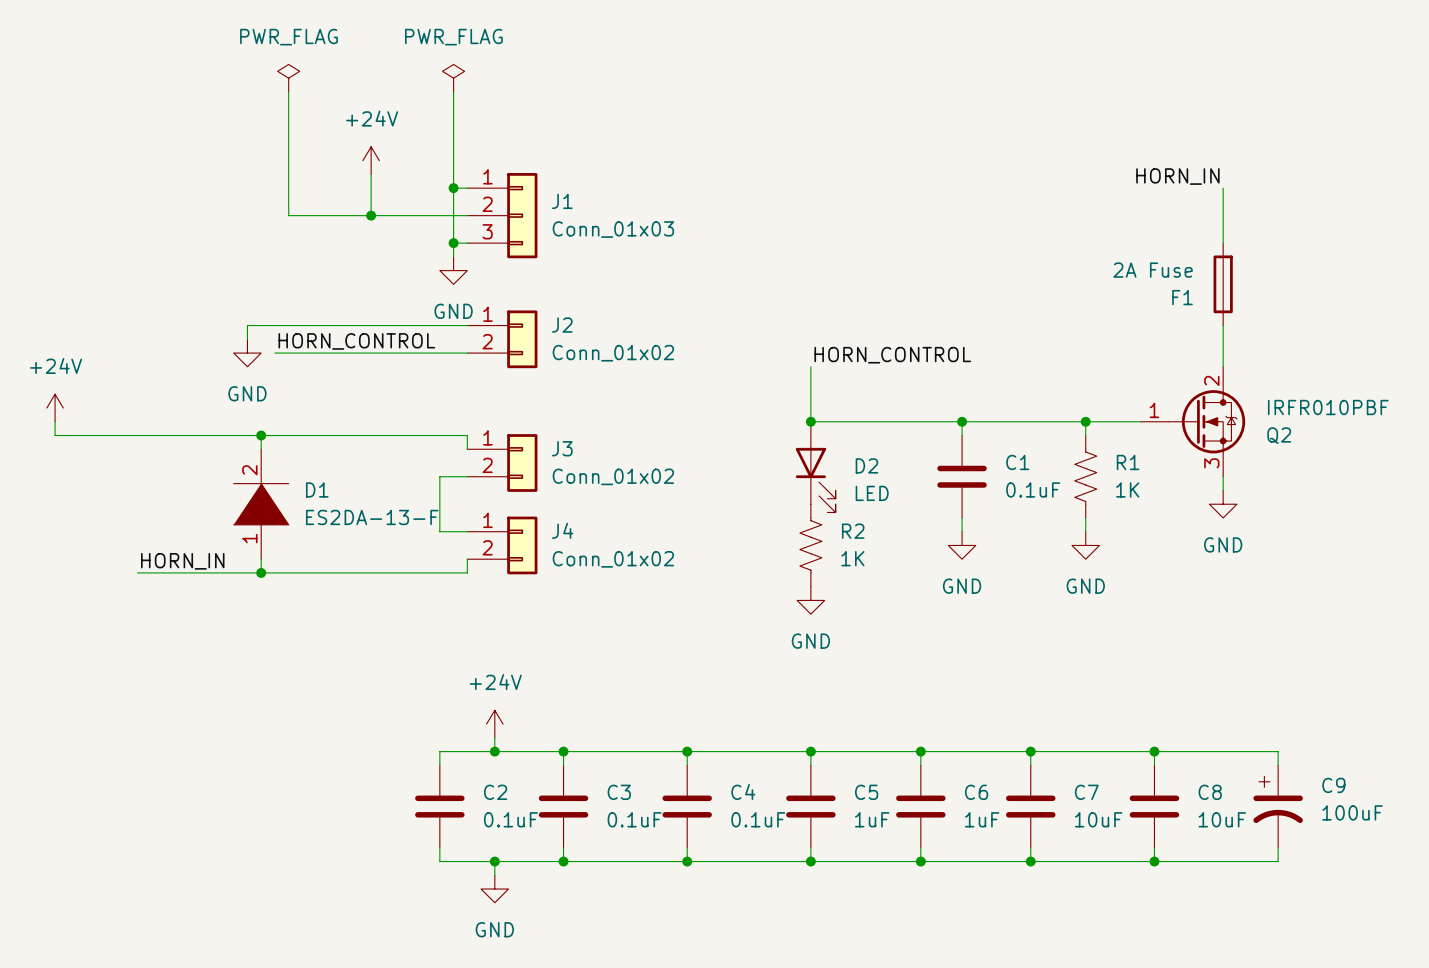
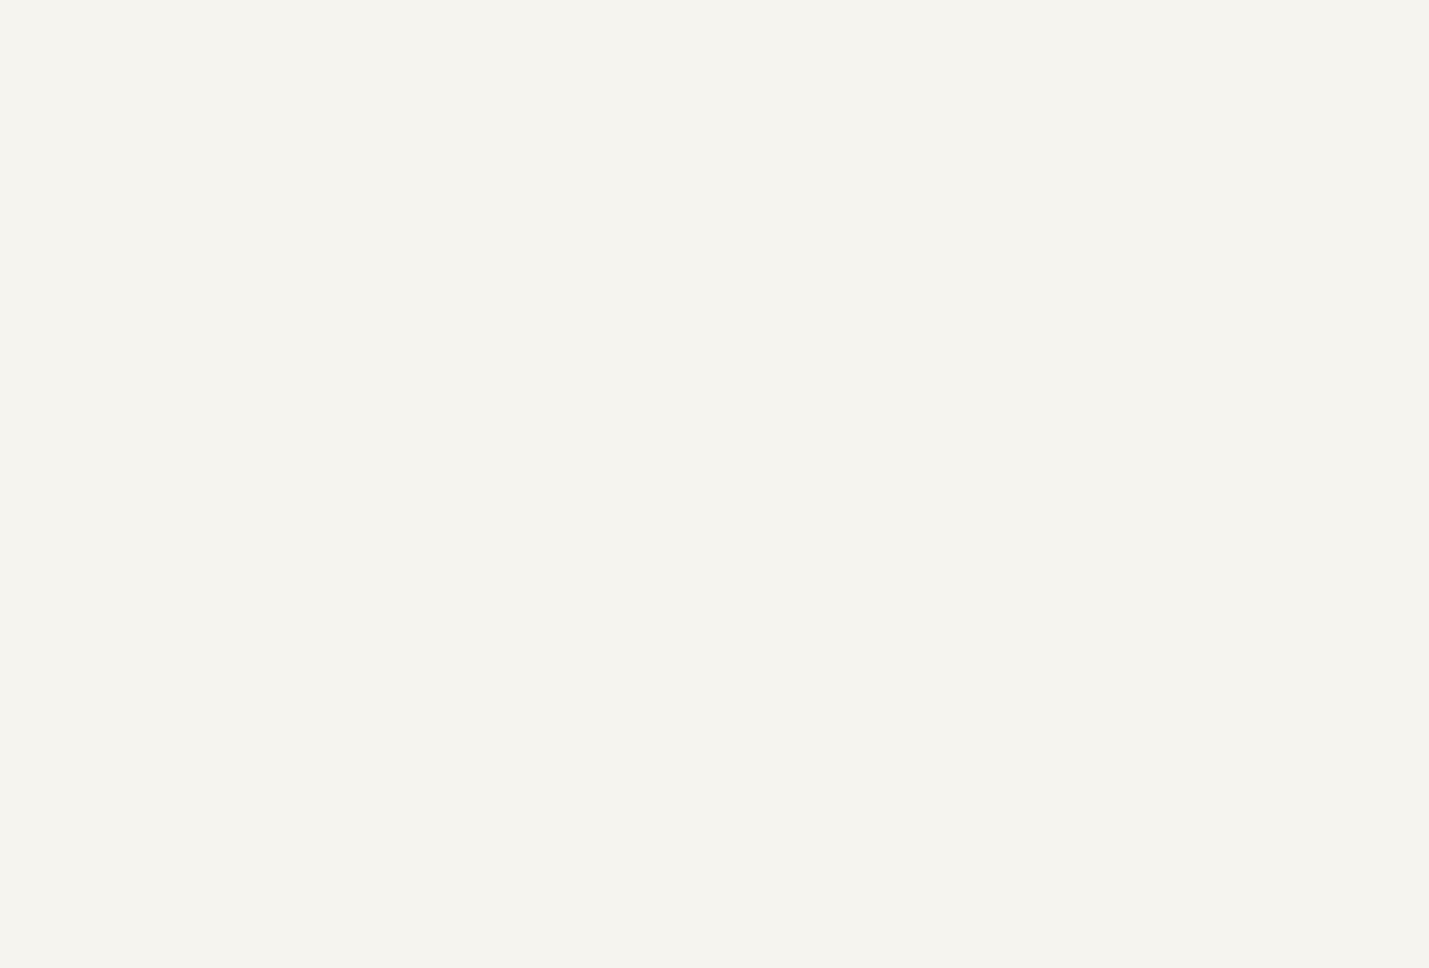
power symbol: PWR_FLAG (288, 78) -> none
power symbol: PWR_FLAG (453, 78) -> none
wire: (288, 91) (288, 215) (467, 215) -> none
wire: (453, 91) (453, 256) -> none
power symbol: +24V (371, 160) -> none
wire: (371, 174) (371, 215) -> none
label: HORN_IN (1177, 176) -> none
wire: (453, 188) (467, 188) -> none
junction: (453, 188) -> none
wire: (1223, 188) (1223, 243) -> none
junction: (371, 215) -> none
J1: Conn_01x03 (502, 215) -> none
wire: (453, 243) (467, 243) -> none
junction: (453, 243) -> none
power symbol: GND (453, 270) -> none
F1: 2A Fuse (1223, 284) -> none
wire: (467, 325) (247, 325) (247, 339) -> none
wire: (1223, 325) (1223, 366) -> none
J2: Conn_01x02 (502, 339) -> none
label: HORN_CONTROL (356, 341) -> none
power symbol: GND (247, 353) -> none
wire: (274, 353) (467, 353) -> none
label: HORN_CONTROL (892, 355) -> none
wire: (810, 366) (810, 421) (1140, 421) -> none
power symbol: +24V (55, 408) -> none
wire: (55, 421) (55, 435) (467, 435) (467, 449) -> none
junction: (810, 421) -> none
wire: (962, 421) (962, 435) -> none
junction: (962, 421) -> none
wire: (1085, 421) (1085, 435) -> none
junction: (1085, 421) -> none
Q2: IRFR010PBF (1192, 421) -> none
wire: (261, 435) (261, 449) -> none
junction: (261, 435) -> none
J3: Conn_01x02 (502, 463) -> none
D2: LED (815, 467) -> none
wire: (467, 476) (439, 476) (439, 531) (467, 531) -> none
C1: 0.1uF (962, 476) -> none
R1: 1K (1085, 476) -> none
wire: (1223, 476) (1223, 490) -> none
D1: ES2DA-13-F (261, 504) -> none
power symbol: GND (1223, 504) -> none
wire: (962, 517) (962, 531) -> none
wire: (1085, 517) (1085, 531) -> none
J4: Conn_01x02 (502, 545) -> none
R2: 1K (810, 545) -> none
power symbol: GND (962, 545) -> none
power symbol: GND (1085, 545) -> none
wire: (261, 559) (261, 572) -> none
wire: (467, 559) (467, 572) (137, 572) -> none
label: HORN_IN (182, 561) -> none
junction: (261, 572) -> none
power symbol: GND (810, 600) -> none
power symbol: +24V (494, 724) -> none
wire: (494, 737) (494, 751) -> none
junction: (494, 751) -> none
wire: (563, 751) (563, 765) -> none
junction: (563, 751) -> none
wire: (687, 751) (687, 765) -> none
junction: (687, 751) -> none
wire: (810, 751) (810, 765) -> none
junction: (810, 751) -> none
wire: (920, 751) (920, 765) -> none
junction: (920, 751) -> none
wire: (1030, 751) (1030, 765) -> none
junction: (1030, 751) -> none
wire: (1154, 751) (1154, 765) -> none
junction: (1154, 751) -> none
wire: (439, 765) (439, 751) (1278, 751) (1278, 765) -> none
C2: 0.1uF (439, 806) -> none
C3: 0.1uF (563, 806) -> none
C4: 0.1uF (687, 806) -> none
C5: 1uF (810, 806) -> none
C6: 1uF (920, 806) -> none
C7: 10uF (1030, 806) -> none
C8: 10uF (1154, 806) -> none
C9: 100uF (1278, 806) -> none
wire: (439, 847) (439, 861) (1278, 861) (1278, 847) -> none
wire: (563, 847) (563, 861) -> none
wire: (687, 847) (687, 861) -> none
wire: (810, 847) (810, 861) -> none
wire: (920, 847) (920, 861) -> none
wire: (1030, 847) (1030, 861) -> none
wire: (1154, 847) (1154, 861) -> none
wire: (494, 861) (494, 875) -> none
junction: (494, 861) -> none
junction: (563, 861) -> none
junction: (687, 861) -> none
junction: (810, 861) -> none
junction: (920, 861) -> none
junction: (1030, 861) -> none
junction: (1154, 861) -> none
power symbol: GND (494, 889) -> none

